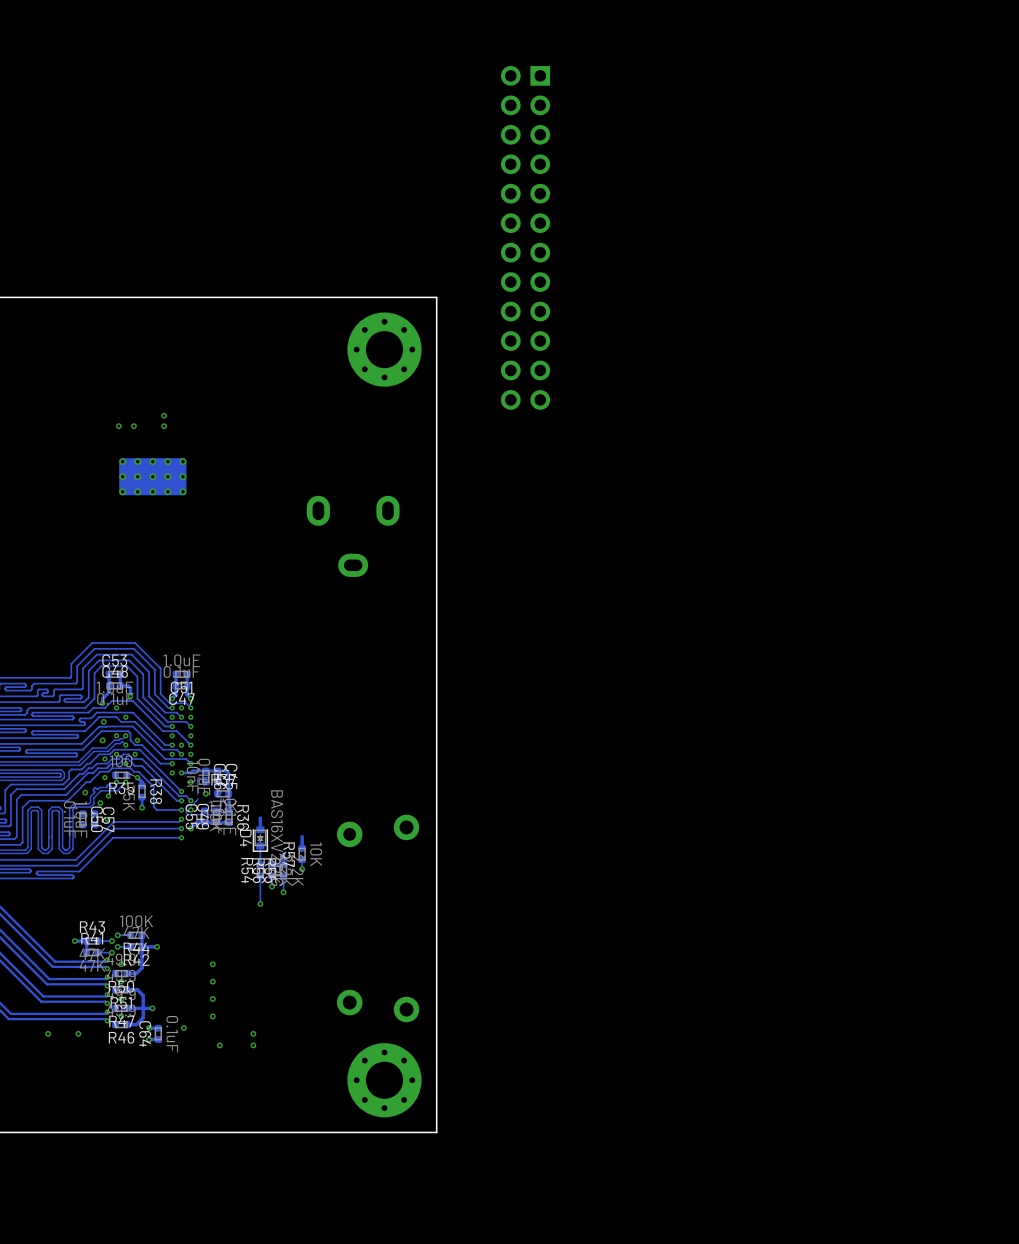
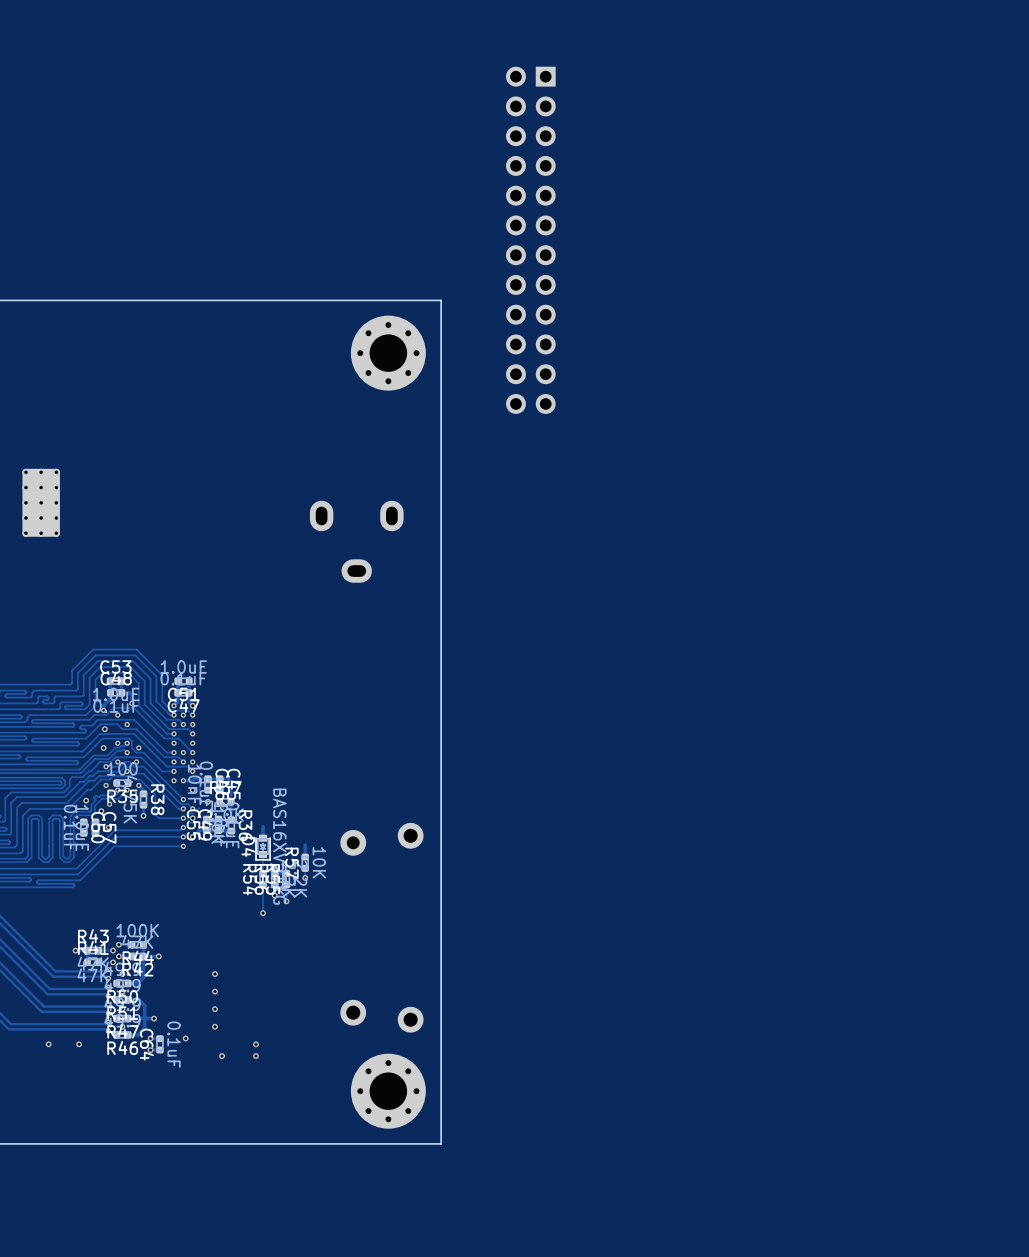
via: (164, 415) -> none
via: (118, 426) -> none
via: (133, 426) -> none
via: (164, 426) -> none
part rotation: 0° (148, 476) -> 90° counterclockwise (41, 506)
part position: (148, 476) -> (41, 506)

